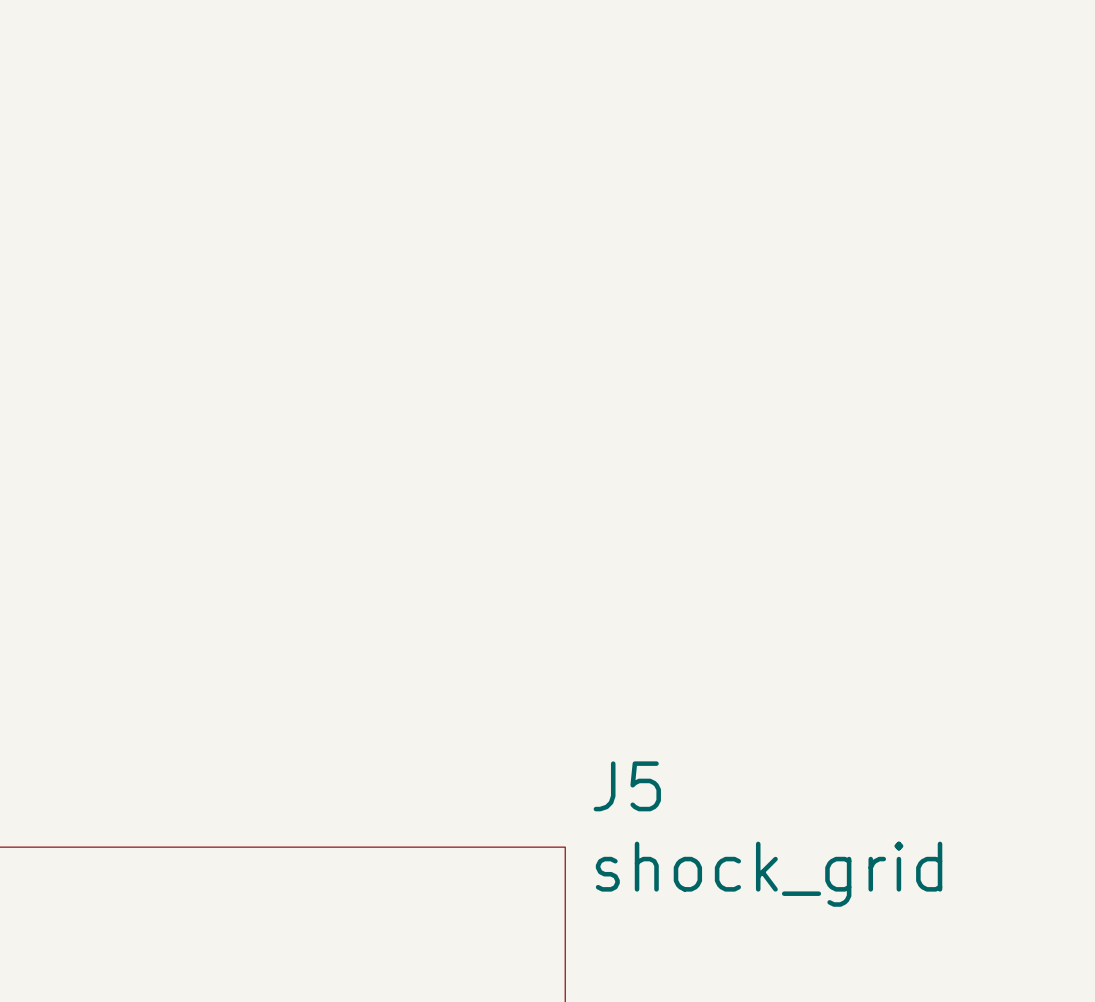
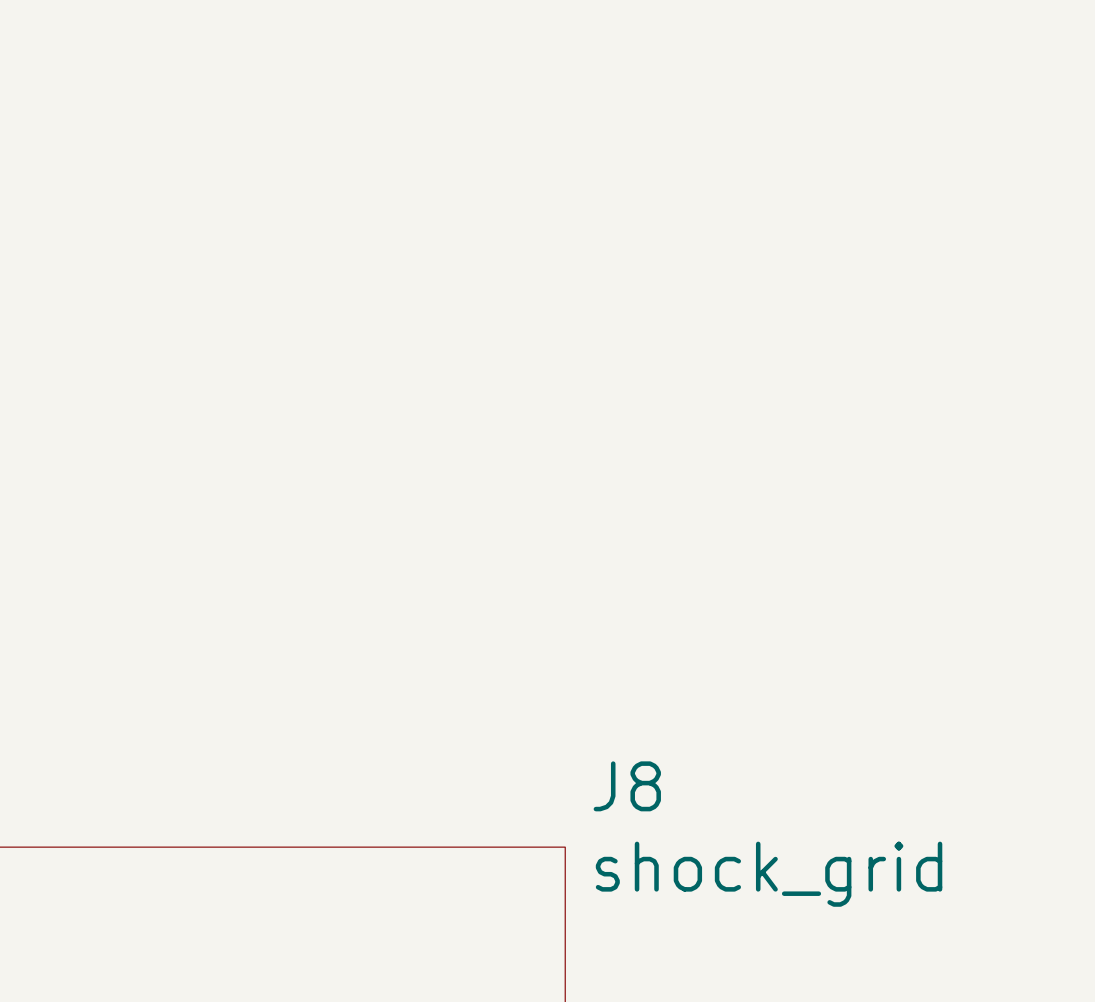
J5 name: J5 (627, 786) -> J8 (627, 786)

